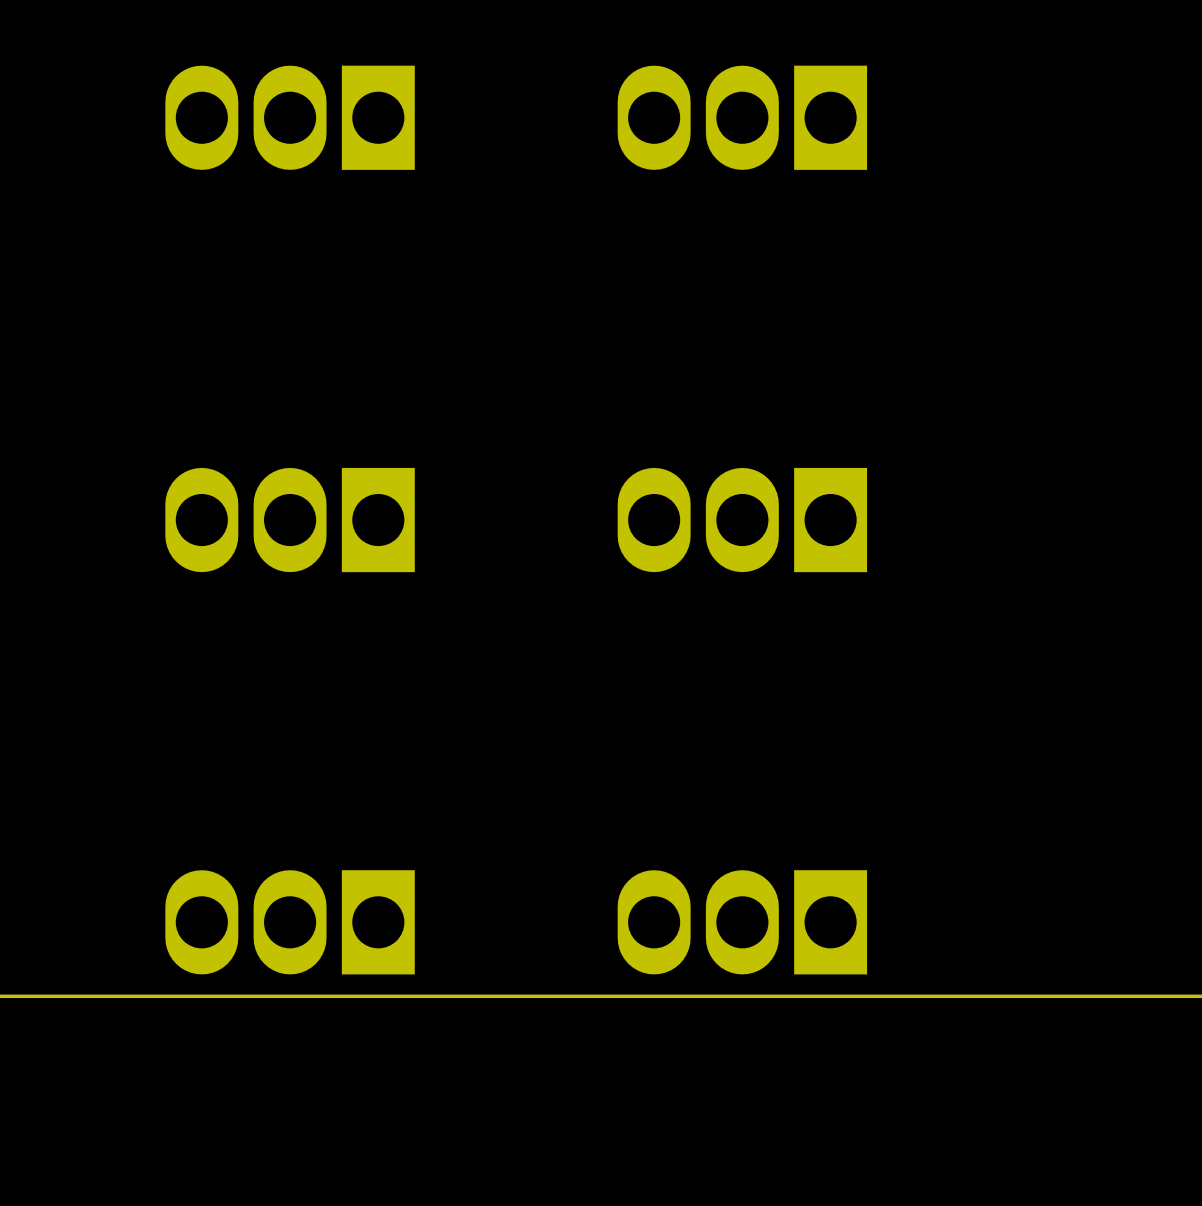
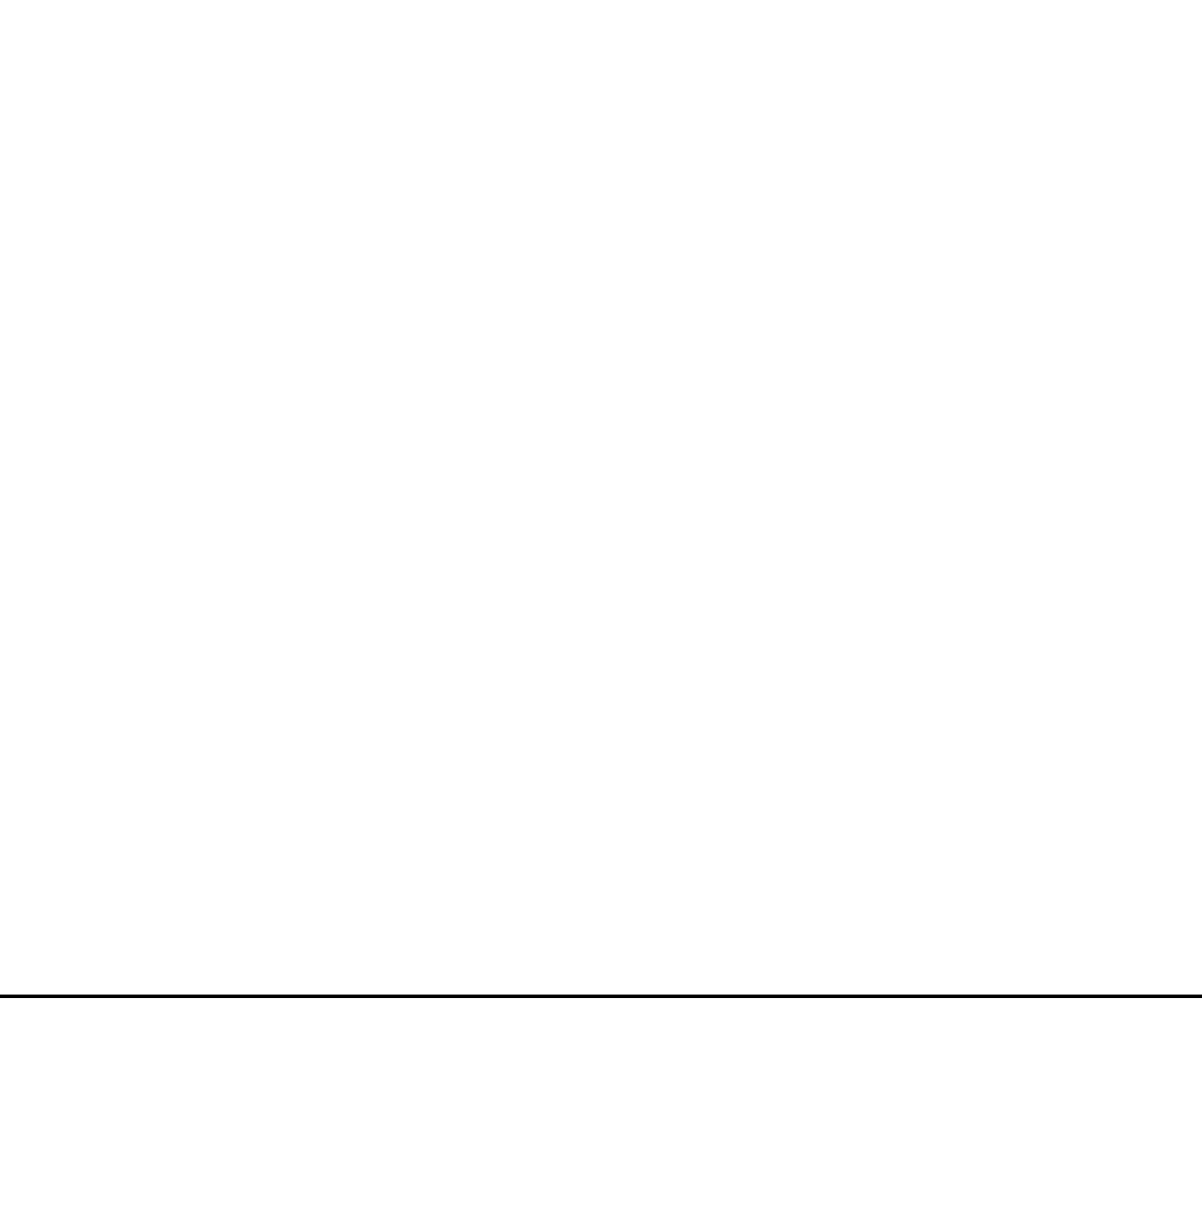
part: (290, 117) -> none
part: (742, 117) -> none
part: (290, 520) -> none
part: (742, 520) -> none
part: (290, 922) -> none
part: (742, 922) -> none

